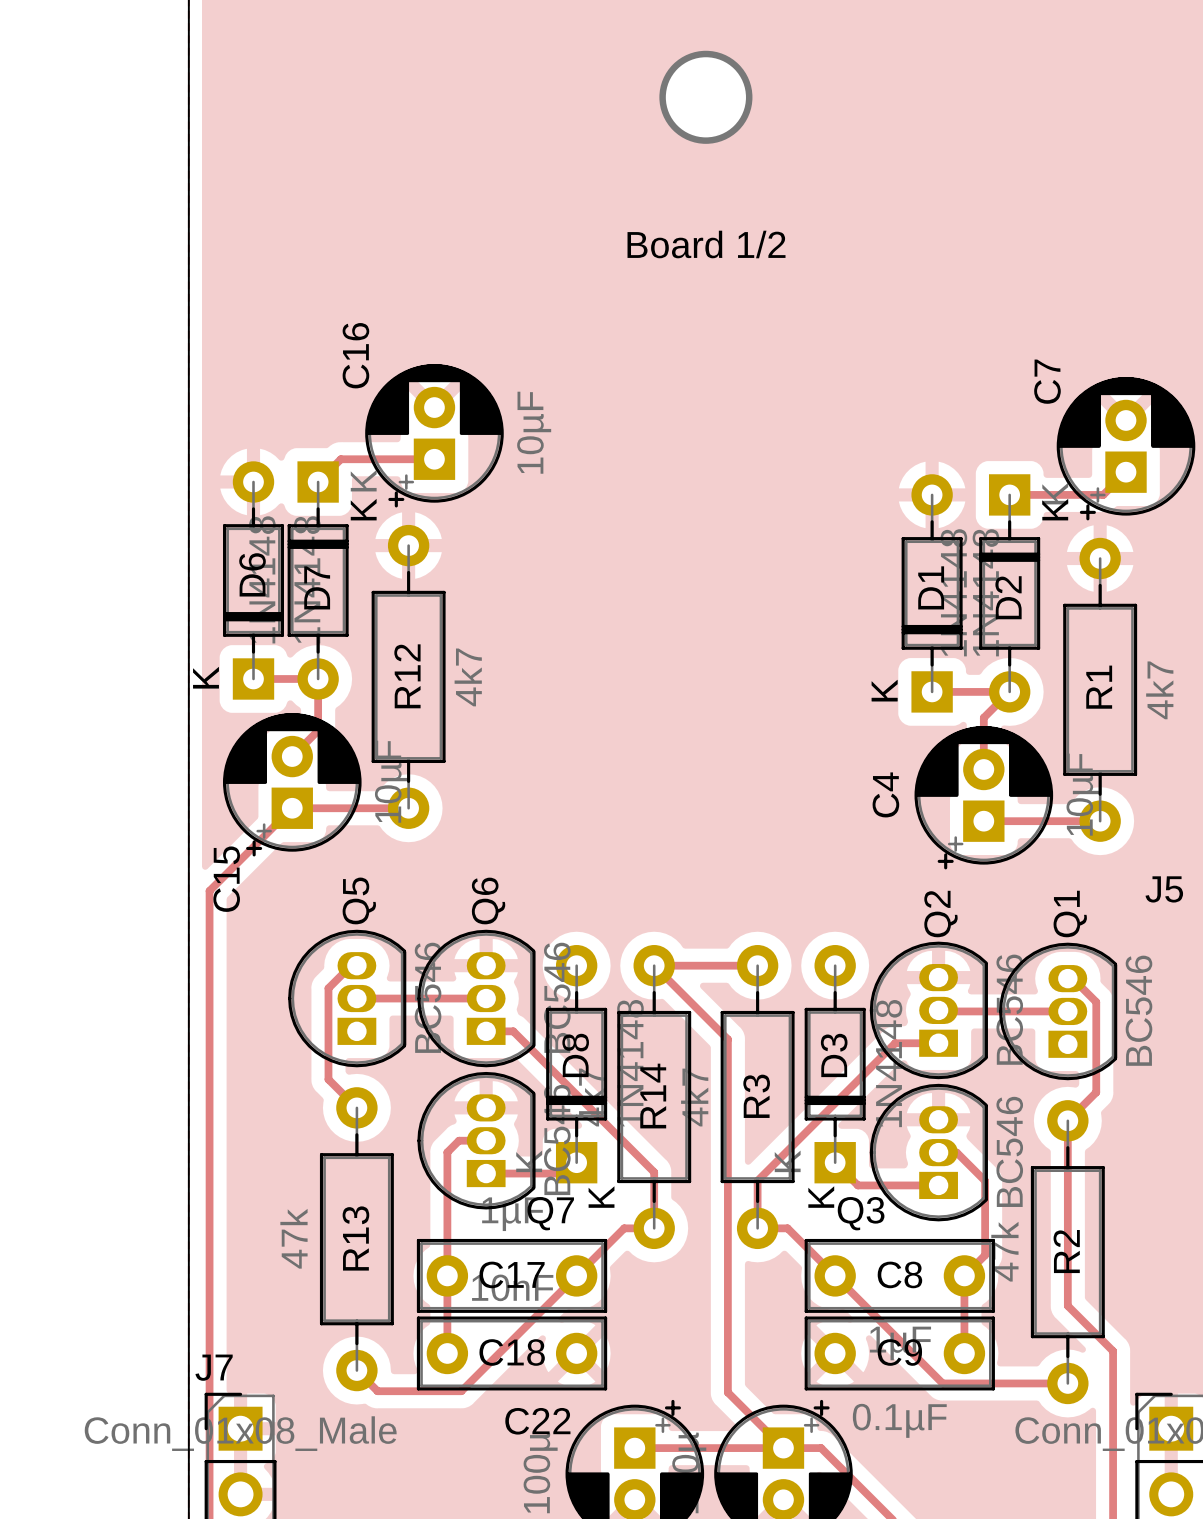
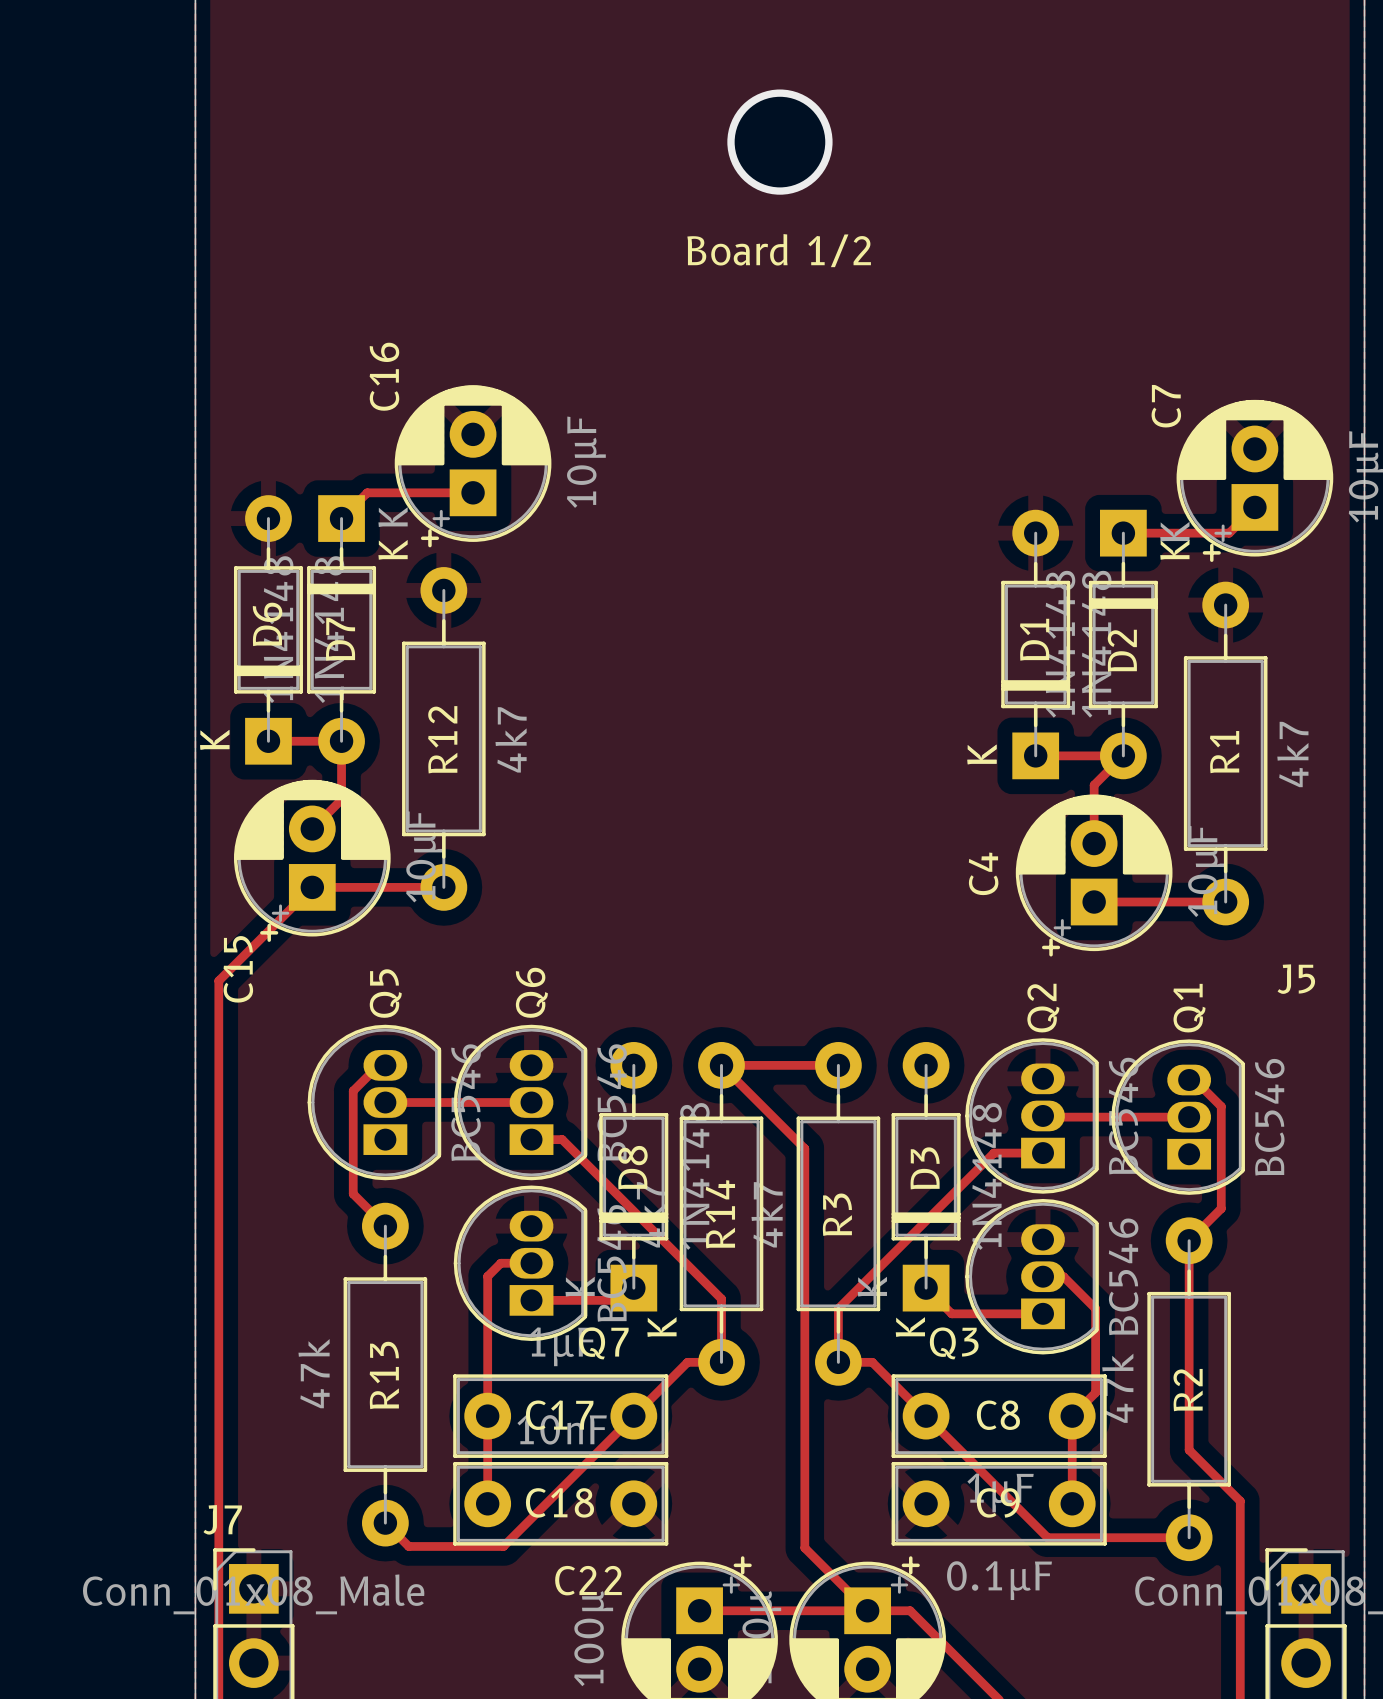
via position: (705, 97) -> (779, 142)

